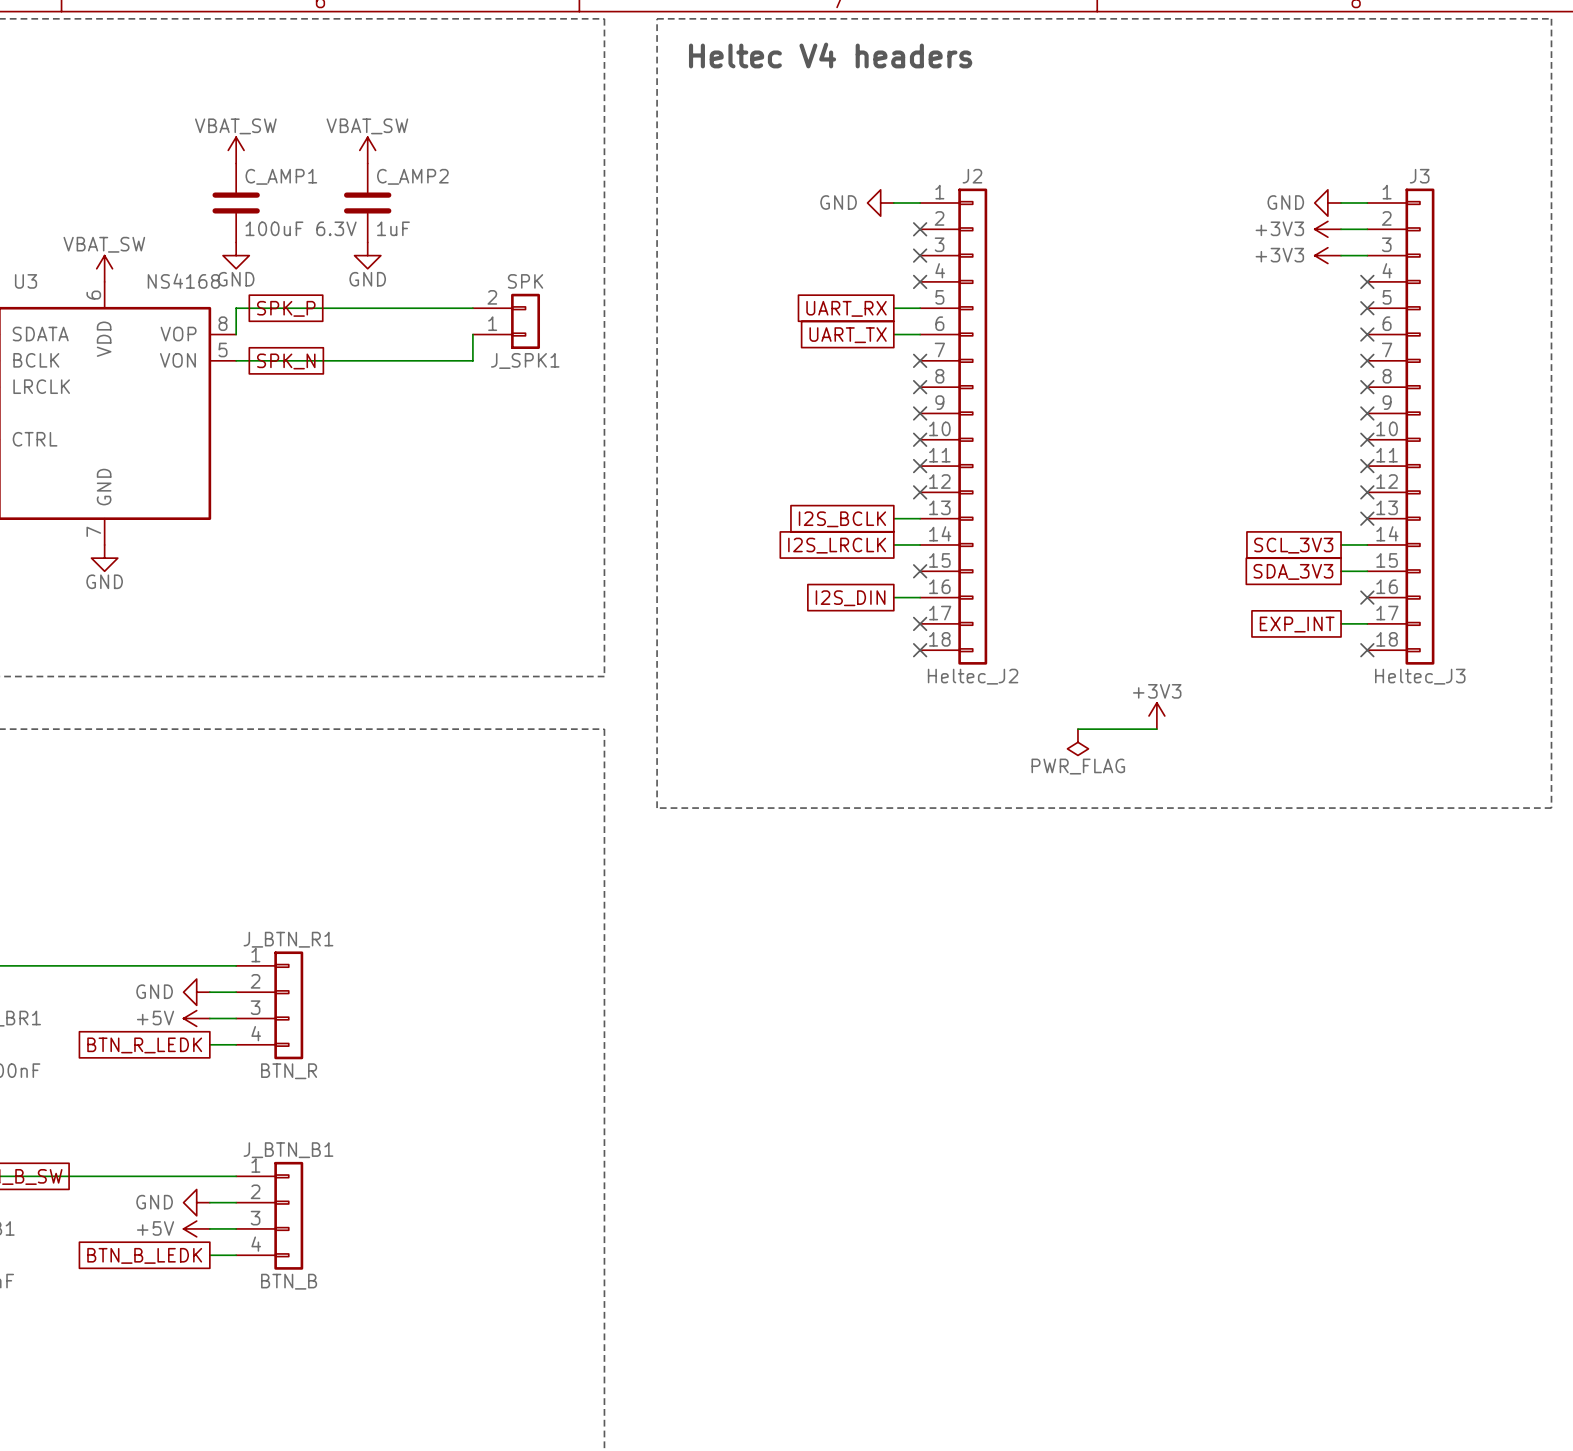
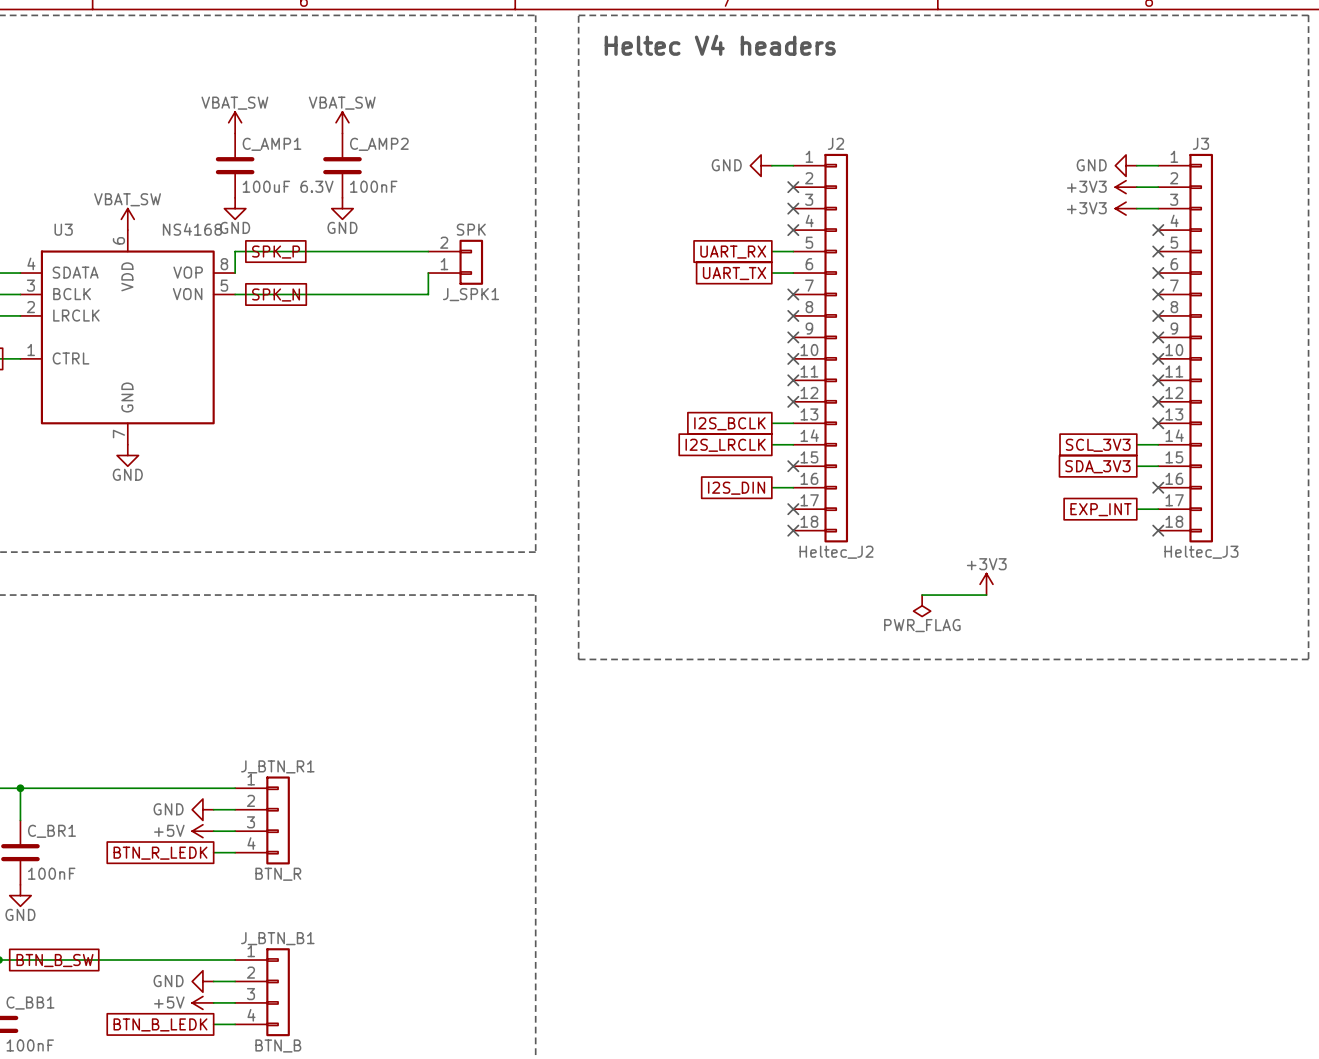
C_AMP2 value: 1uF (393, 228) -> 100nF (373, 186)

